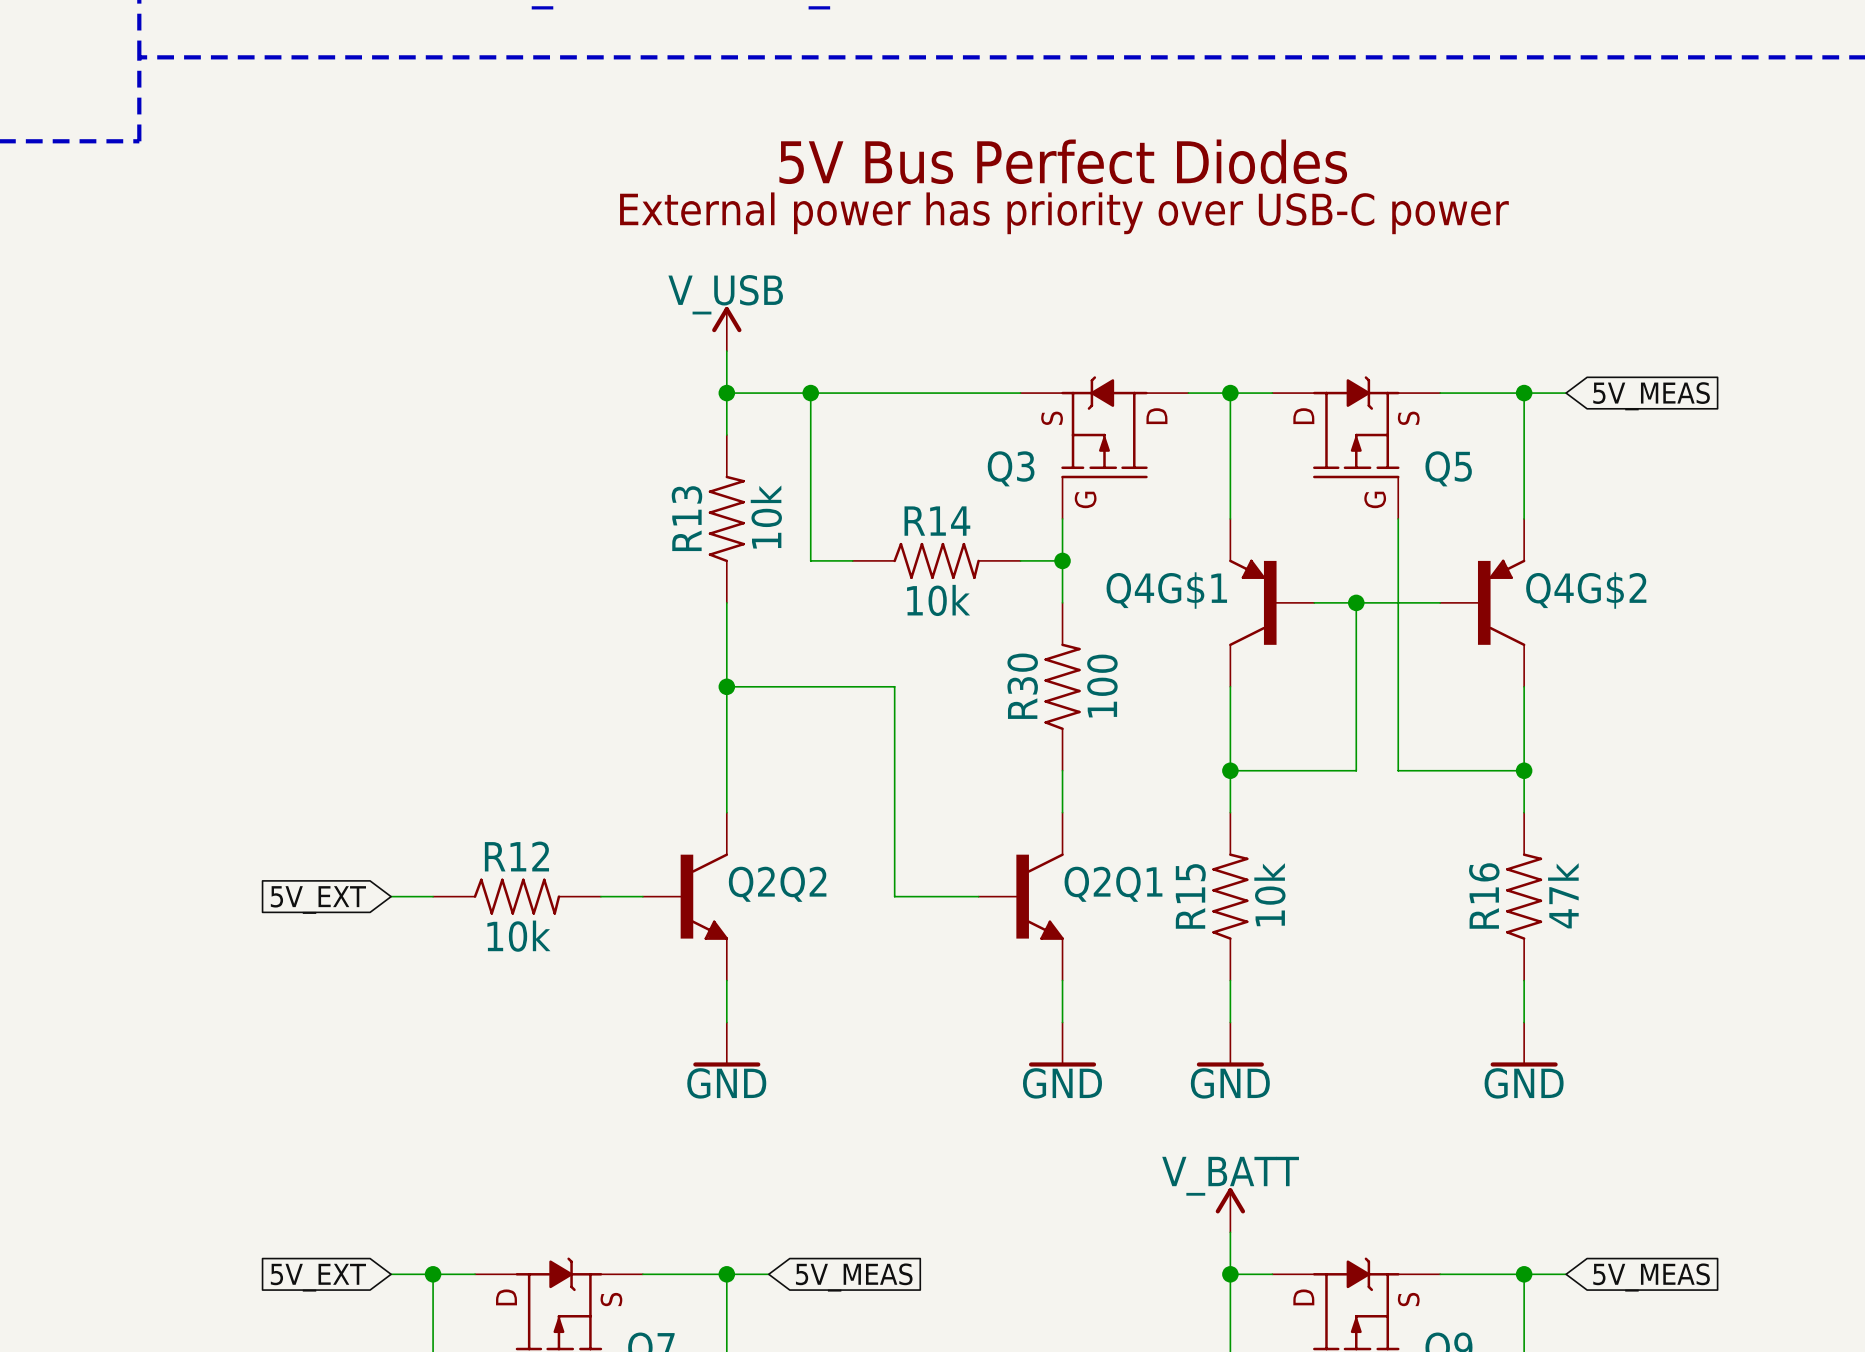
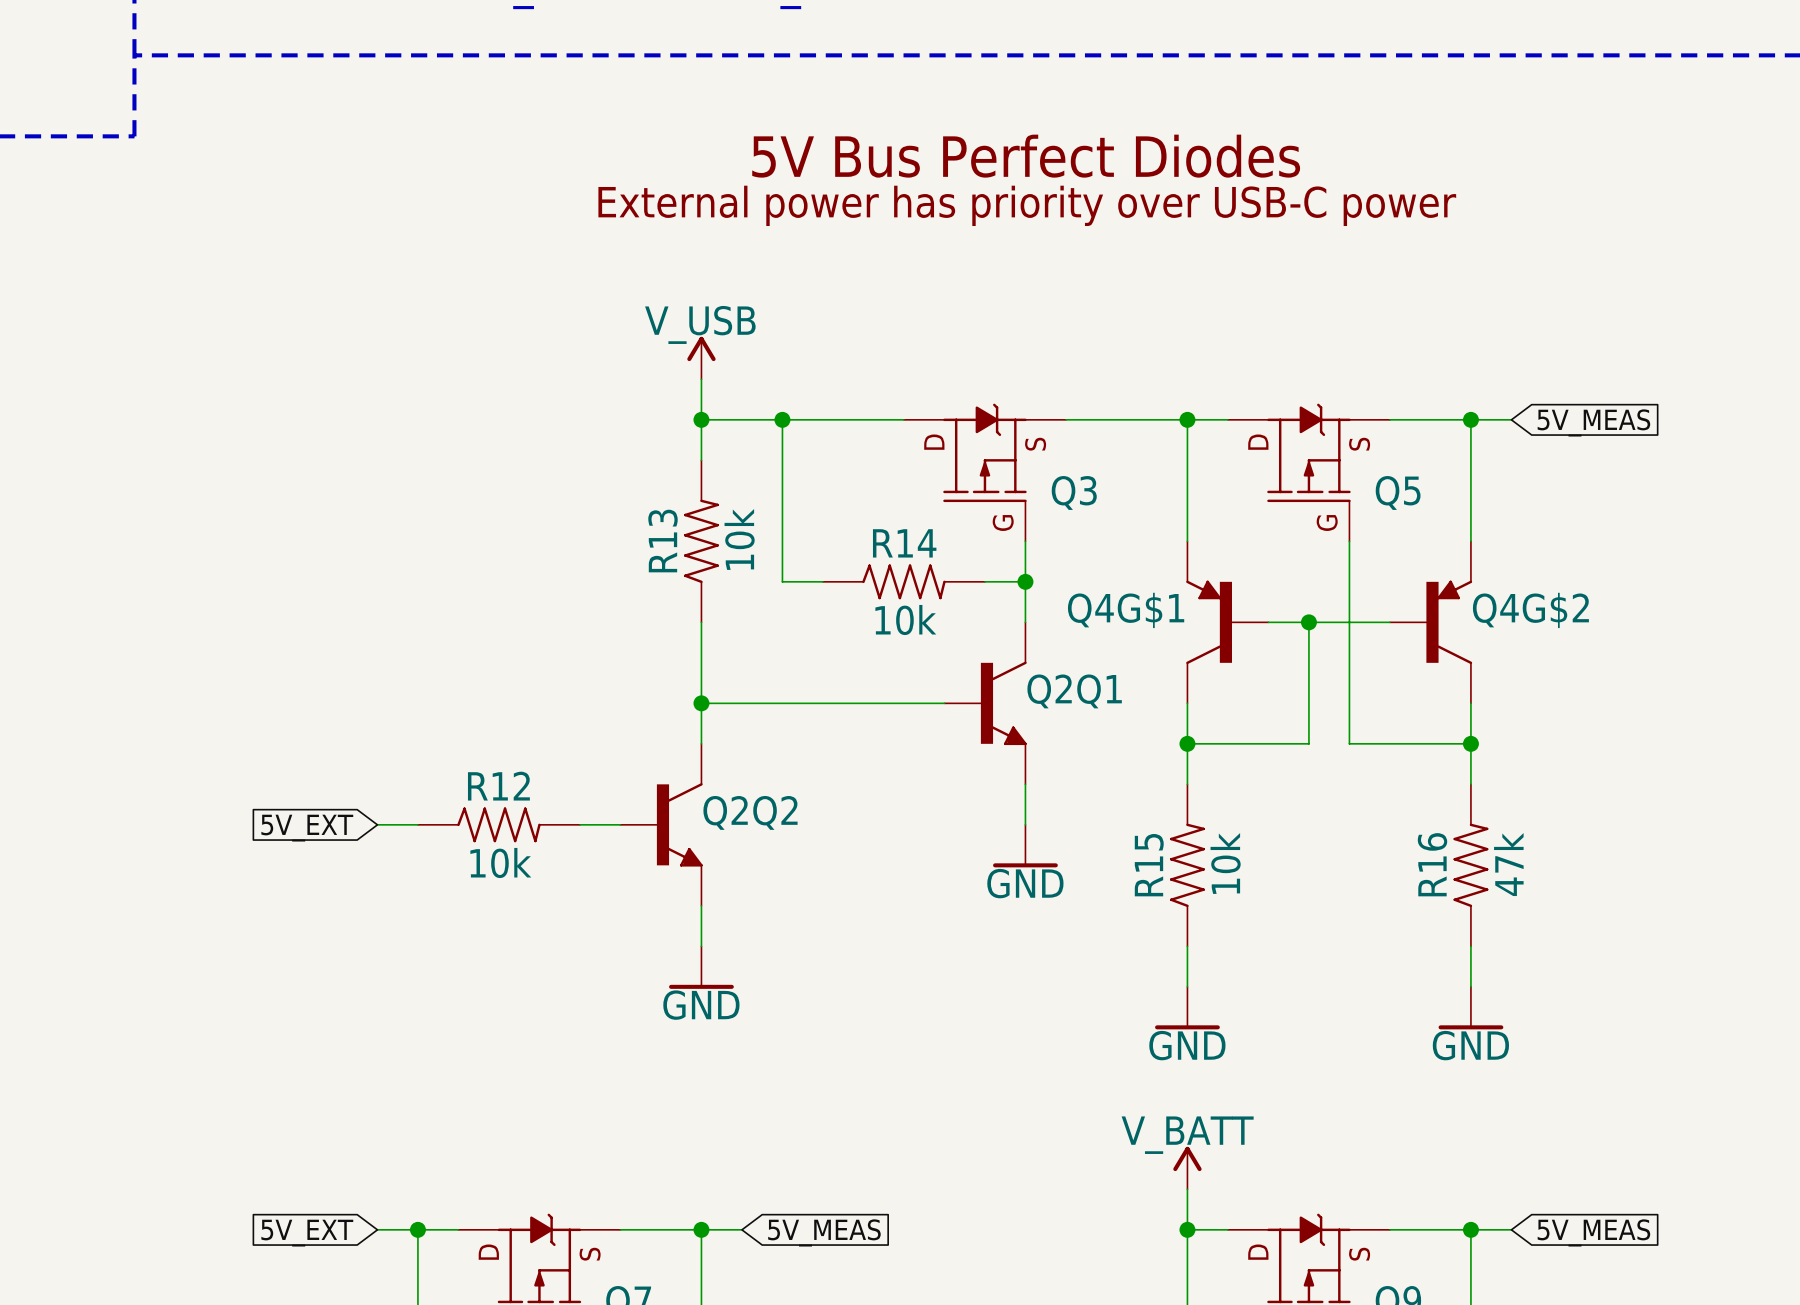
power symbol position: V_USB (726, 329) -> V_USB (701, 358)
wire: (726, 351) (726, 393) (1020, 393) -> none
Q3 symbol: [1020, 376, 1189, 519] -> [903, 403, 1066, 542]
junction position: (726, 393) -> (701, 419)
wire: (810, 393) (810, 435) -> none
junction position: (810, 393) -> (782, 419)
wire: (1188, 393) (1272, 393) -> none
wire: (1230, 393) (1230, 435) -> none
junction position: (1230, 393) -> (1187, 419)
wire: (1440, 393) (1566, 393) -> (1389, 419) (1511, 419)
wire: (1524, 393) (1524, 435) -> none
junction position: (1524, 393) -> (1470, 419)
global label position: 5V_MEAS (1651, 396) -> 5V_MEAS (1593, 422)
wire: none -> (903, 419) (701, 419) (701, 460)
wire: none -> (1065, 419) (1227, 419)
Q5 position: (1356, 447) -> (1308, 472)
Q3 name position: Q3 (1011, 468) -> Q3 (1074, 492)
R13 position: (726, 518) -> (701, 541)
wire: (1062, 518) (1062, 560) (1020, 560) -> none
wire: (810, 560) (852, 560) -> (782, 541) (782, 581) (822, 581)
R14 position: (936, 560) -> (903, 581)
junction position: (1062, 560) -> (1025, 581)
wire: none -> (984, 581) (1025, 581) (1025, 622)
Q4G$1 position: (1271, 602) -> (1227, 622)
wire: (1314, 602) (1440, 602) -> (1268, 622) (1389, 622)
wire: (1356, 602) (1356, 644) -> none
junction position: (1356, 602) -> (1308, 622)
Q4G$2 position: (1482, 602) -> (1431, 622)
wire: (726, 686) (894, 686) (894, 896) (978, 896) -> none
junction position: (726, 686) -> (701, 703)
R30: 100 (1062, 686) -> none
wire: none -> (701, 703) (944, 703)
wire: (391, 896) (433, 896) -> (377, 824) (417, 824)
R12 position: (516, 896) -> (498, 824)
wire: (600, 896) (642, 896) -> (579, 824) (620, 824)
Q2Q2 position: (685, 896) -> (661, 824)
Q2Q1 position: (1021, 896) -> (985, 703)
global label position: 5V_EXT (318, 900) -> 5V_EXT (307, 828)
wire: (1062, 980) (1062, 1022) -> none
power symbol position: GND (726, 1044) -> GND (701, 967)
power symbol position: GND (1062, 1044) -> GND (1025, 846)

